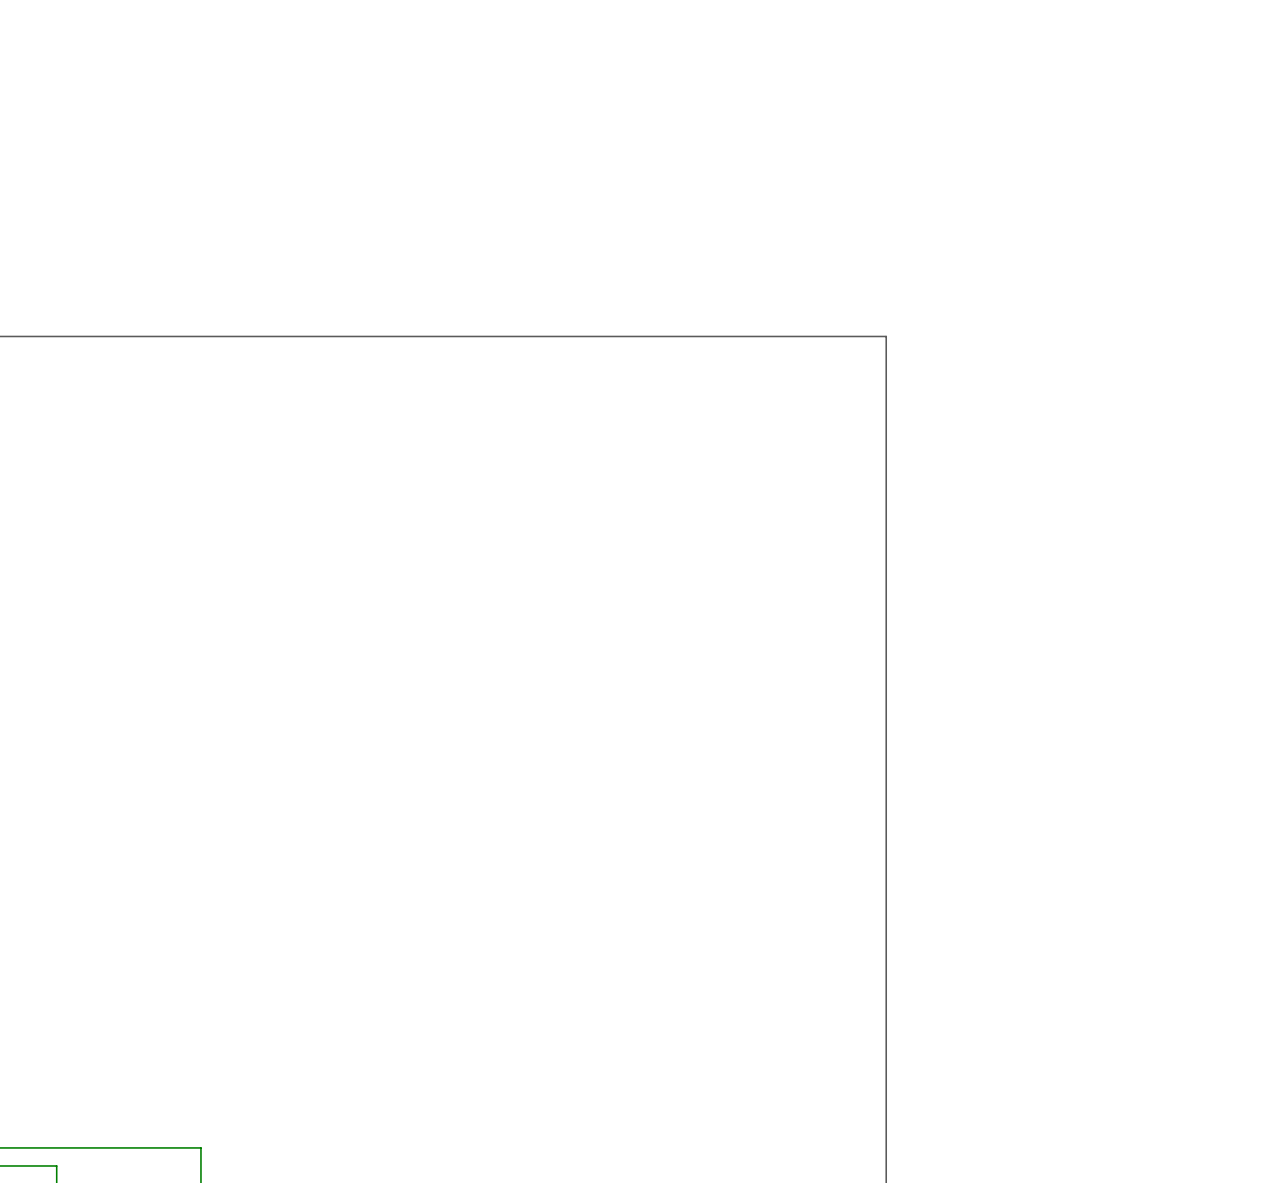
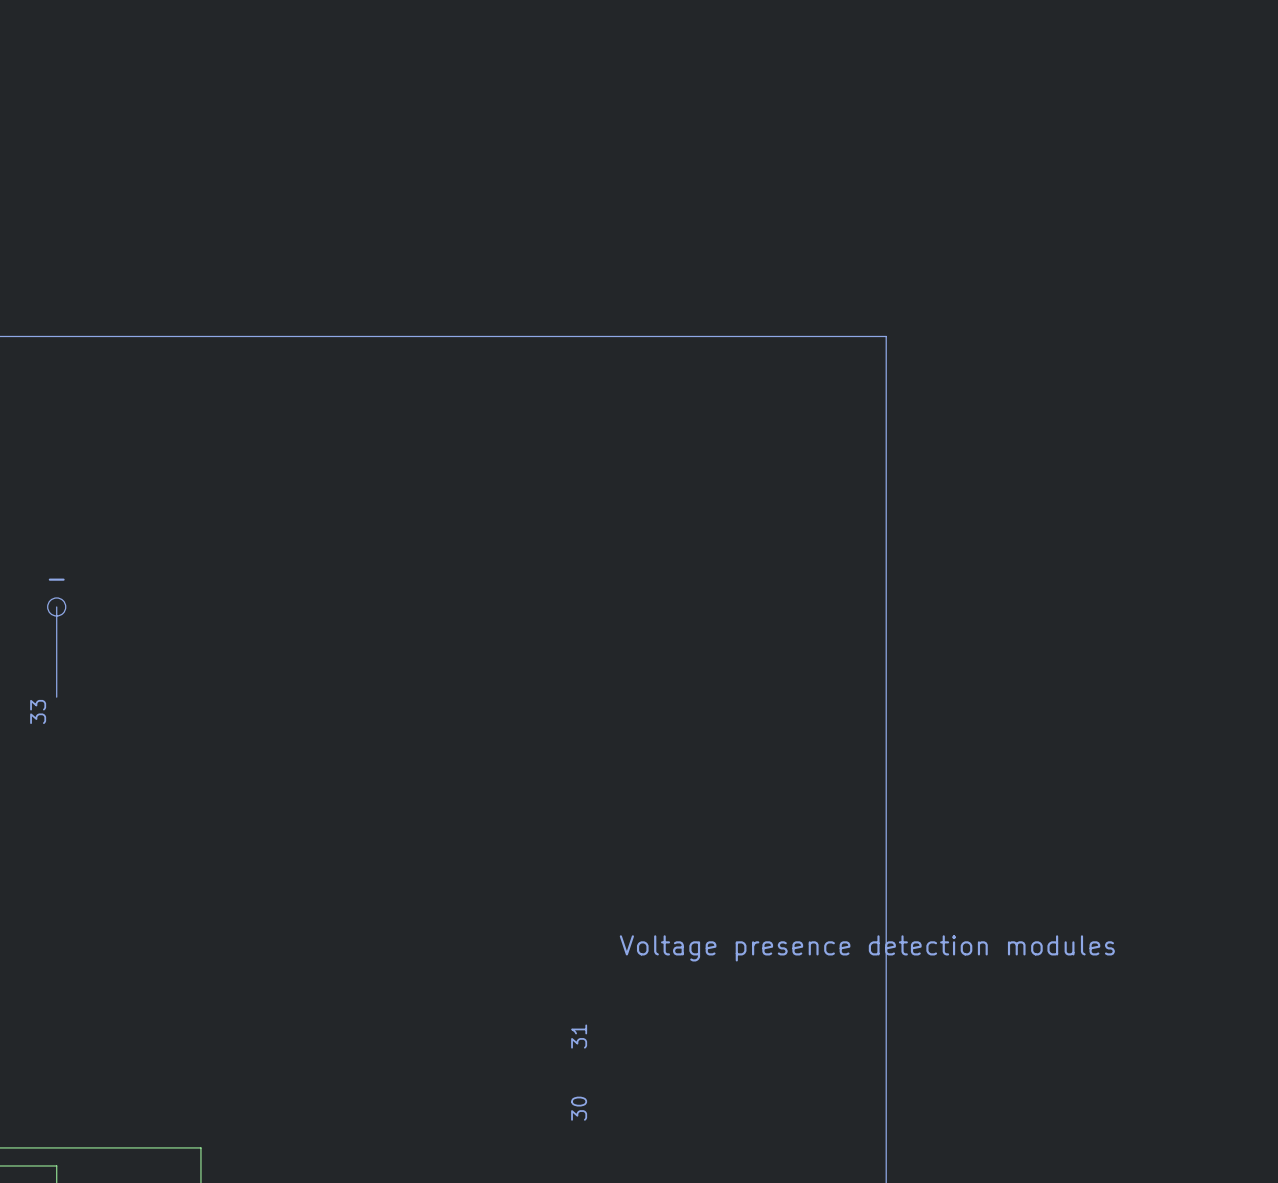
text: none -> - (56, 579)
drawing: none -> [47, 597, 66, 616]
line: none -> (56, 606) (56, 697)
text: none -> 33 (38, 711)
text: none -> Voltage presence detection modules (867, 948)
text: none -> 31 (579, 1036)
text: none -> 30 (579, 1108)

